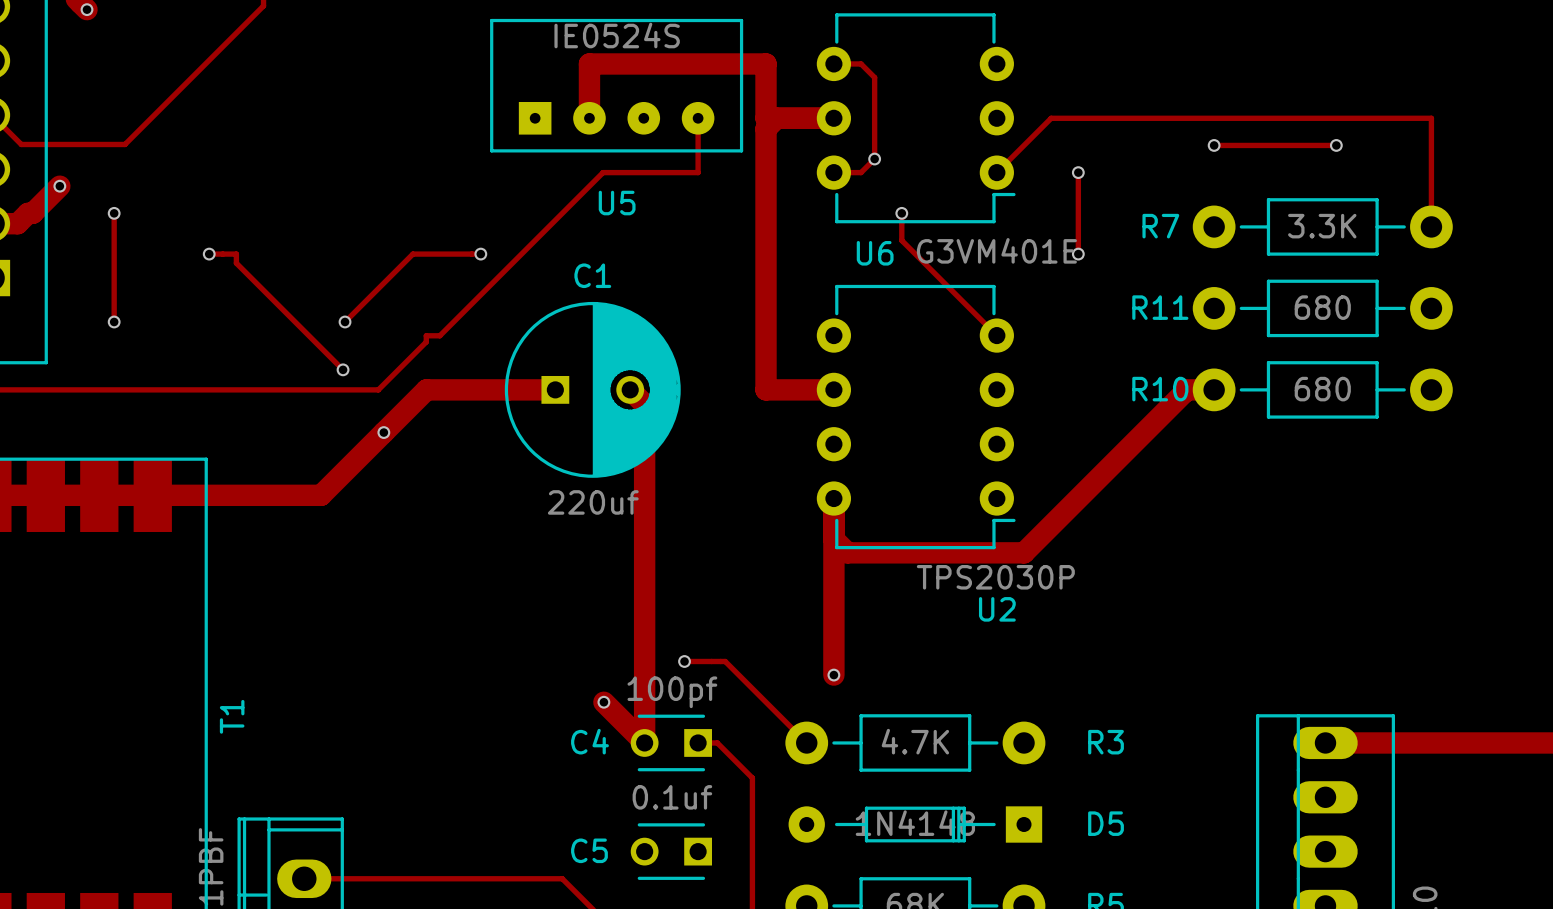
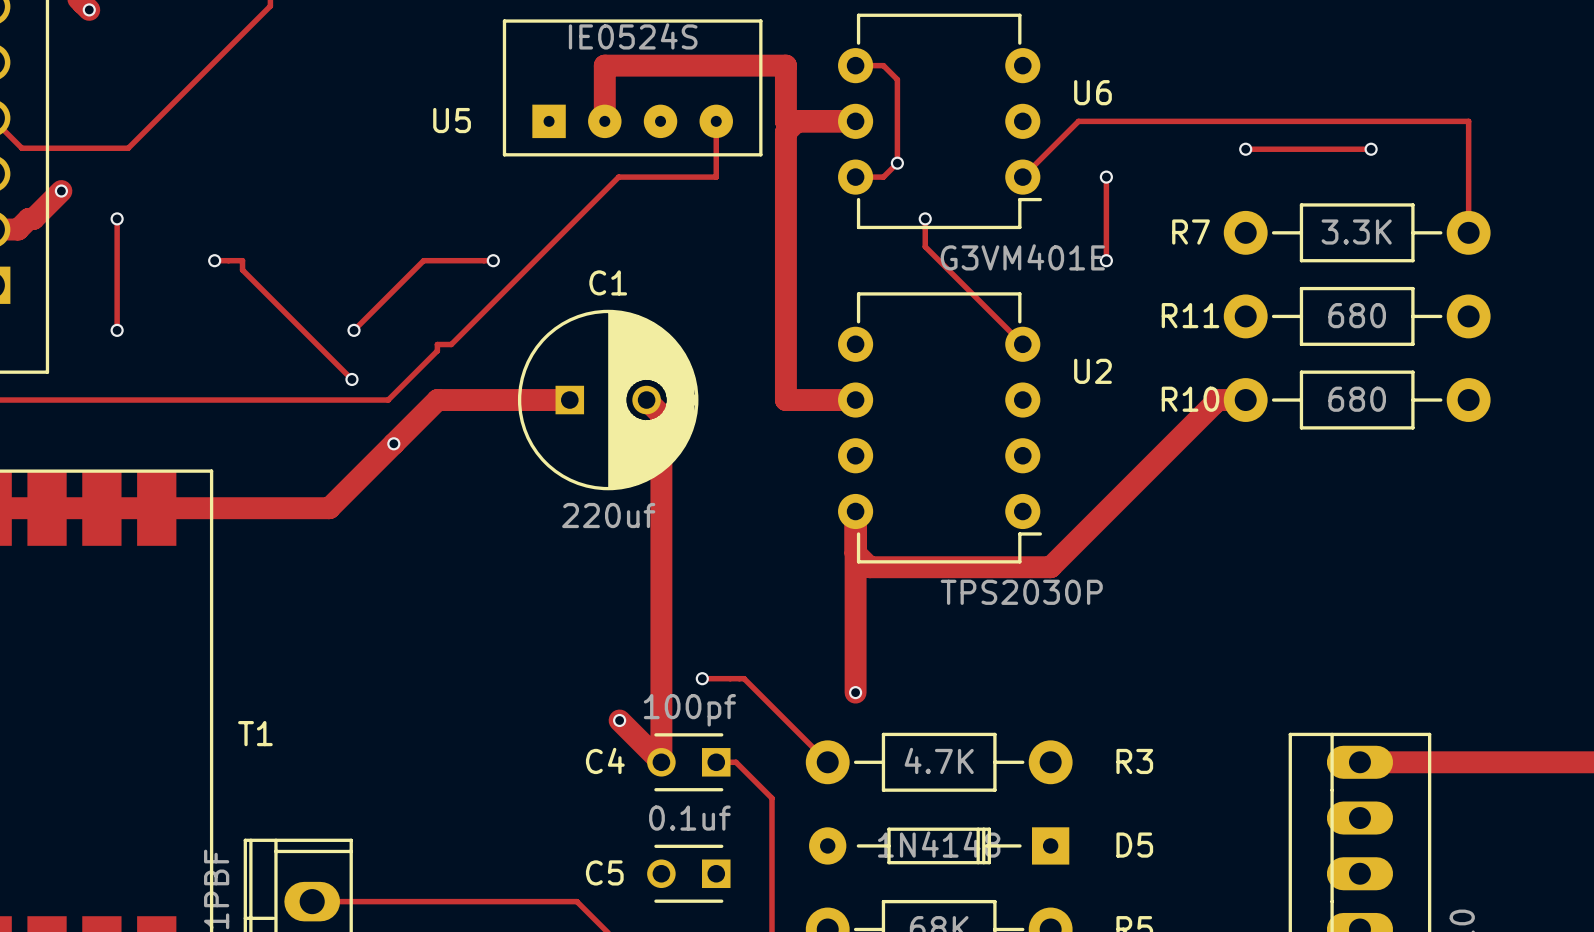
U5 name position: U5 (617, 203) -> U5 (452, 120)
U6 name position: U6 (875, 253) -> U6 (1092, 92)
U2 name position: U2 (997, 609) -> U2 (1092, 371)
T1 name rotation: 0° (232, 716) -> 90° clockwise (255, 733)

